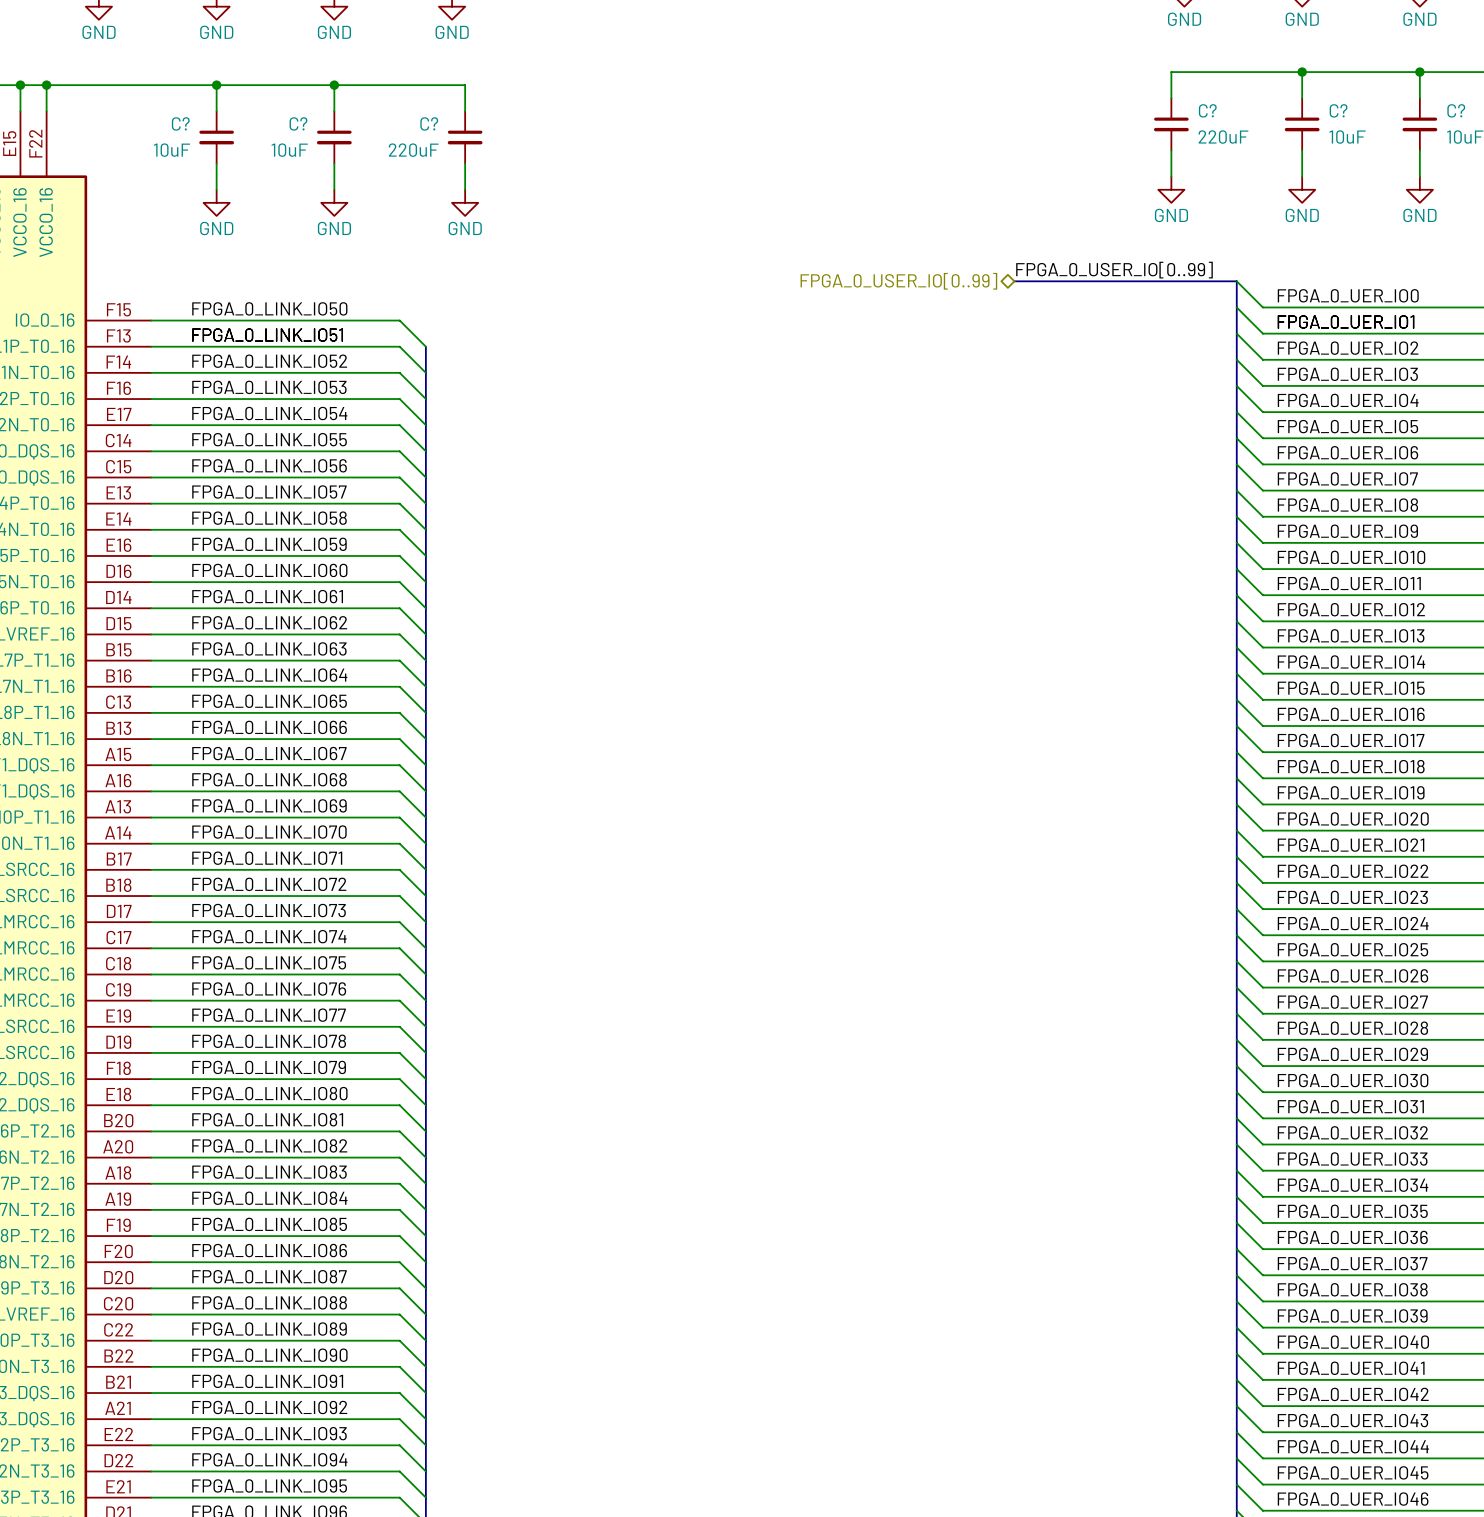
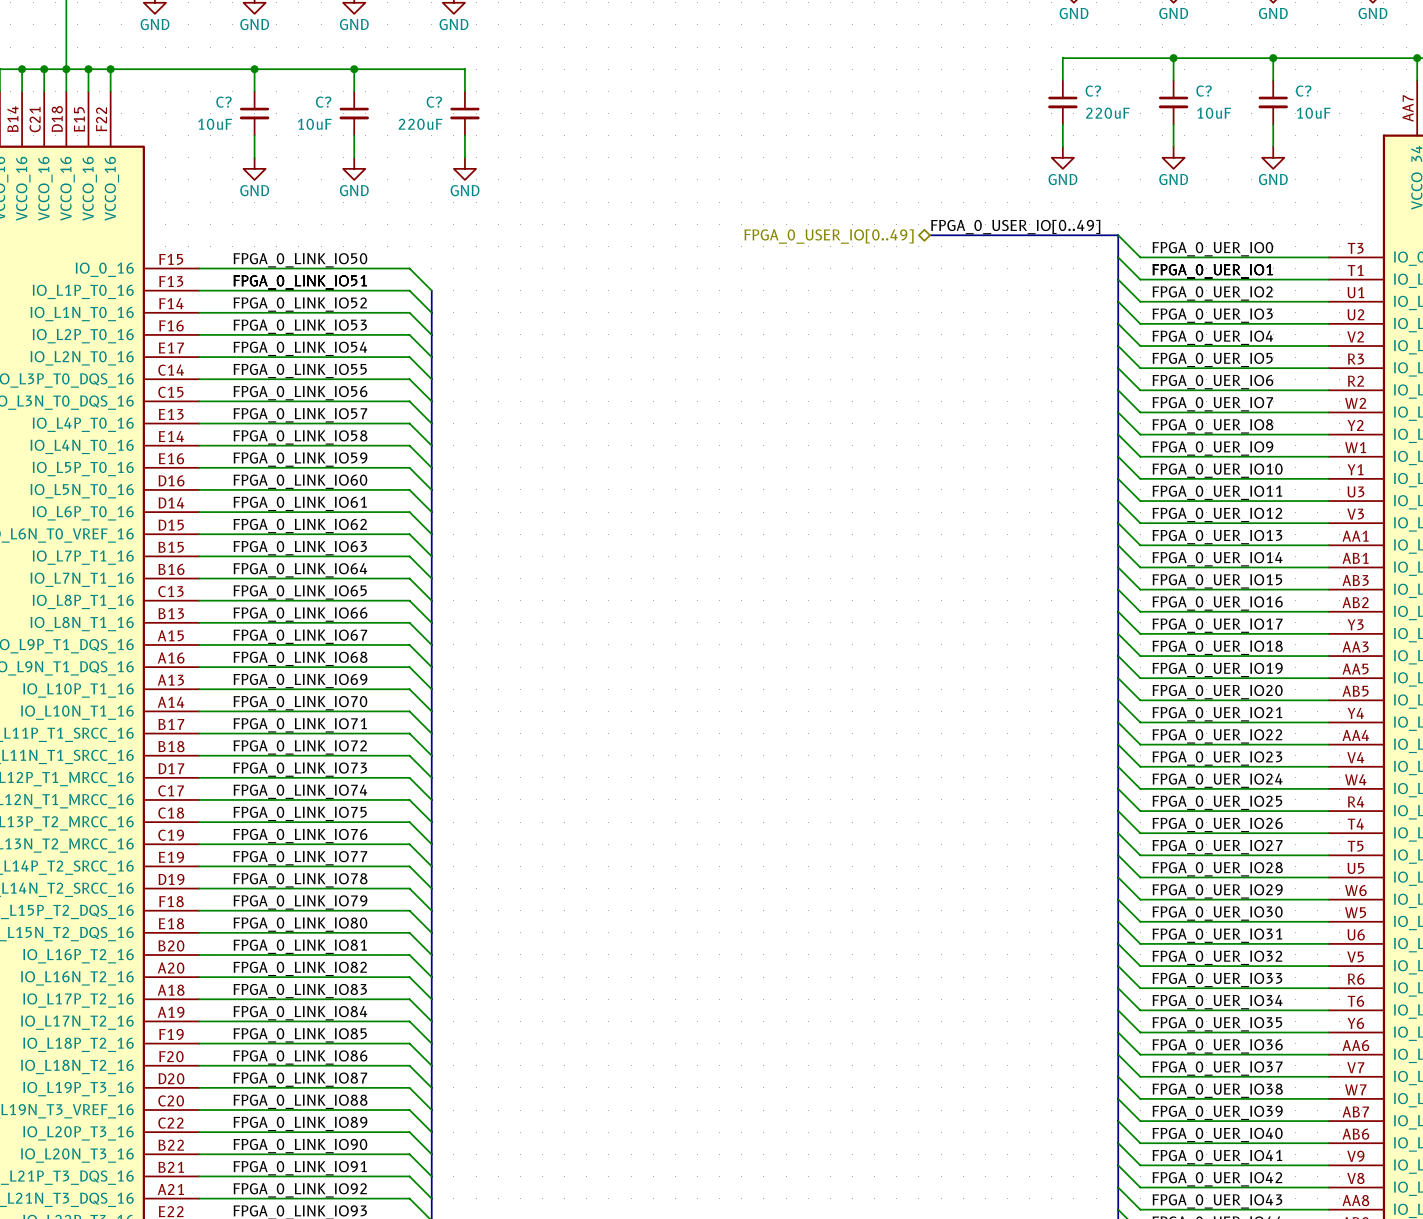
label: FPGA_0_USER_IO[0..99] (1114, 270) -> FPGA_0_USER_IO[0..49] (1015, 227)
hierarchical label: FPGA_0_USER_IO[0..99] (898, 281) -> FPGA_0_USER_IO[0..49] (829, 236)

